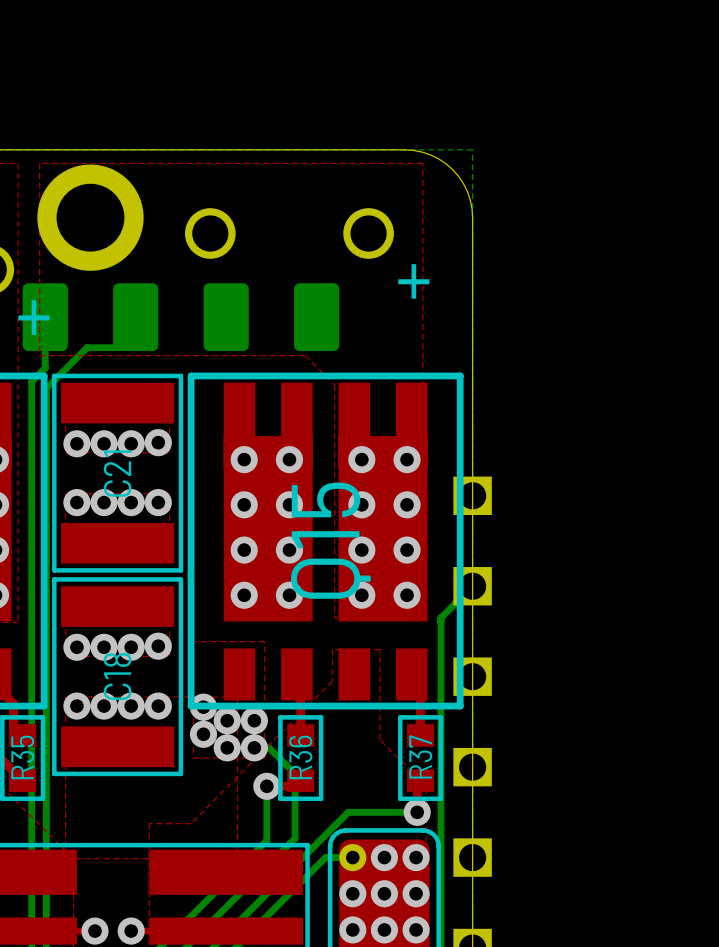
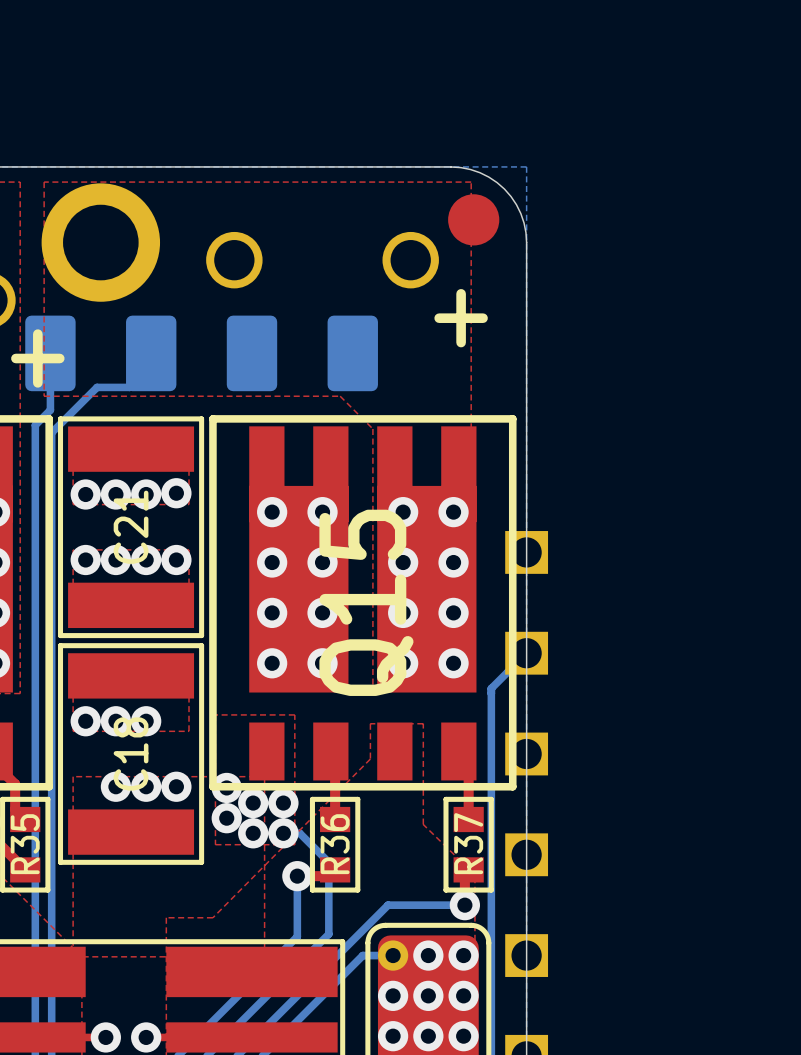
part: none -> (473, 219)
via: (158, 646) -> none
via: (76, 706) -> none

